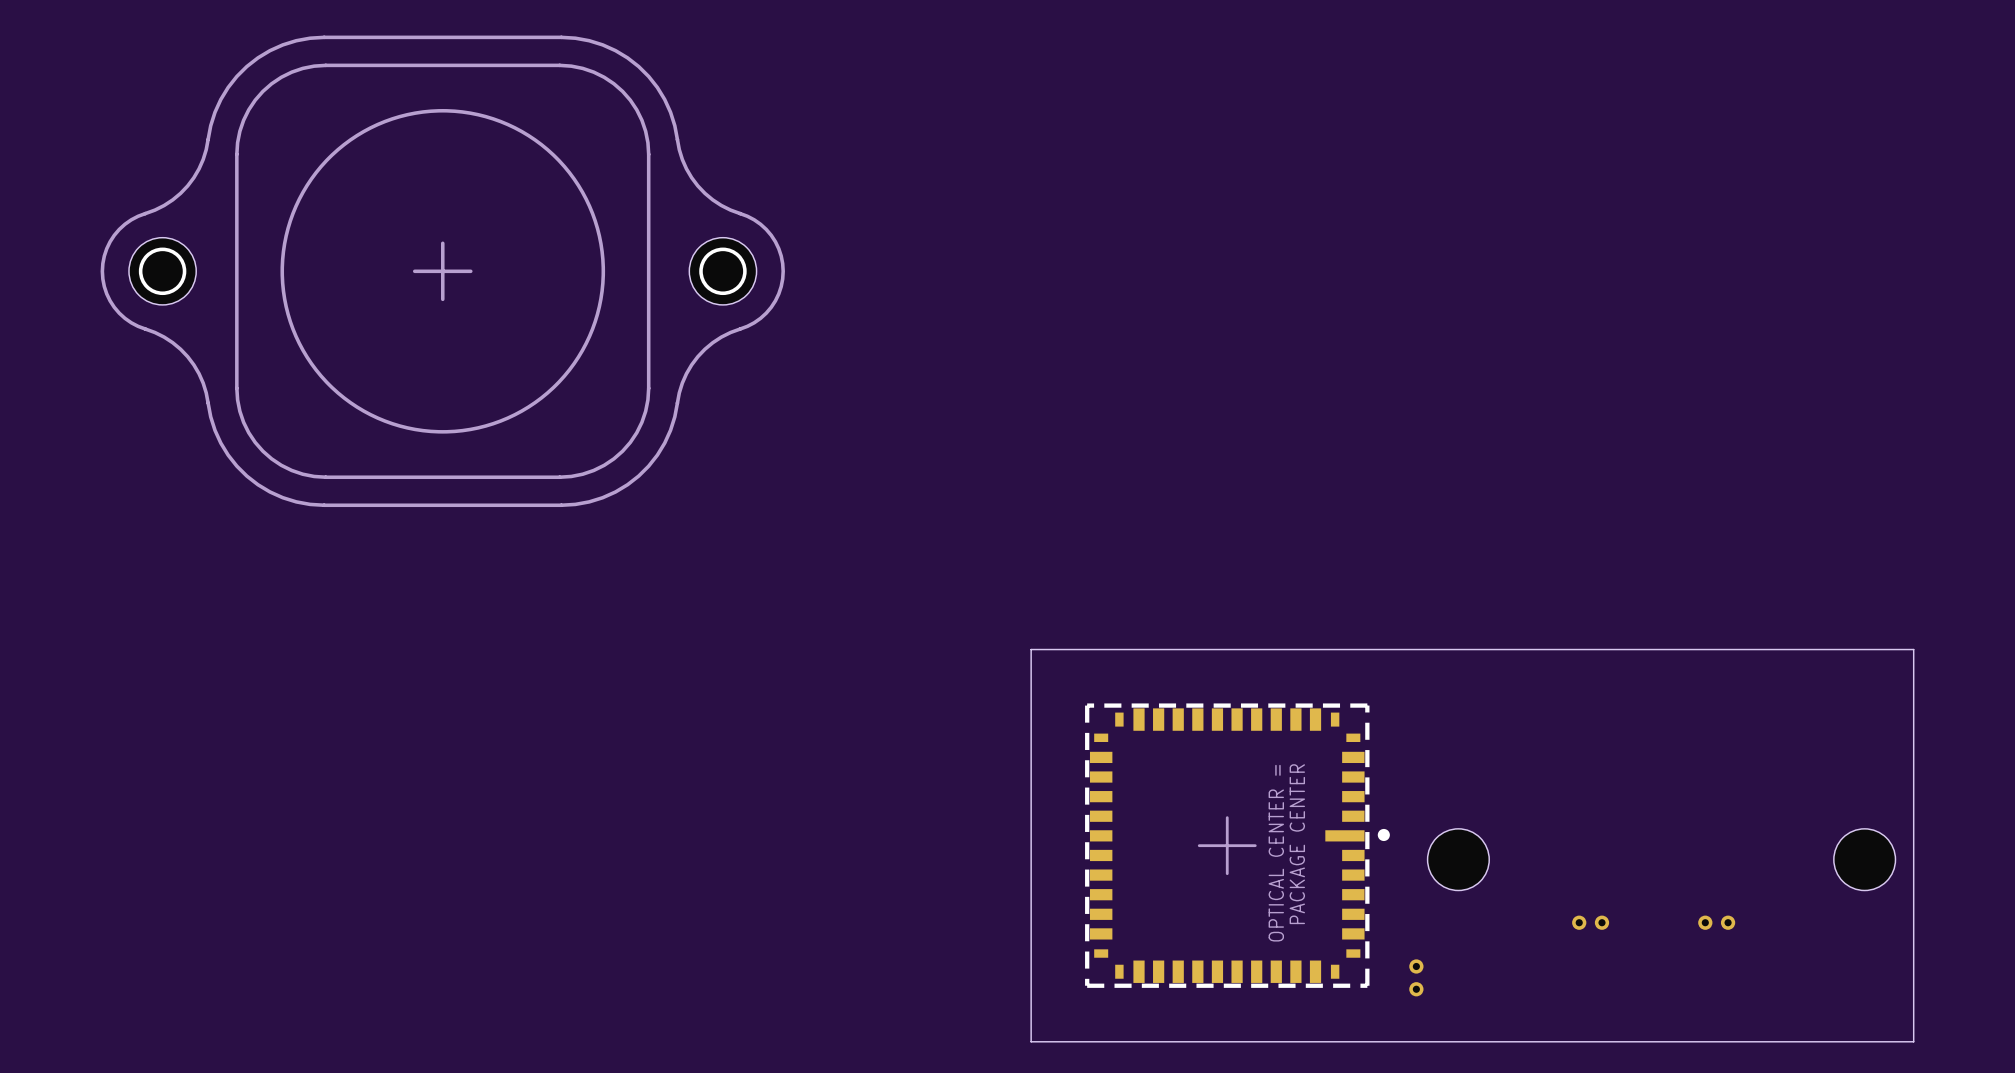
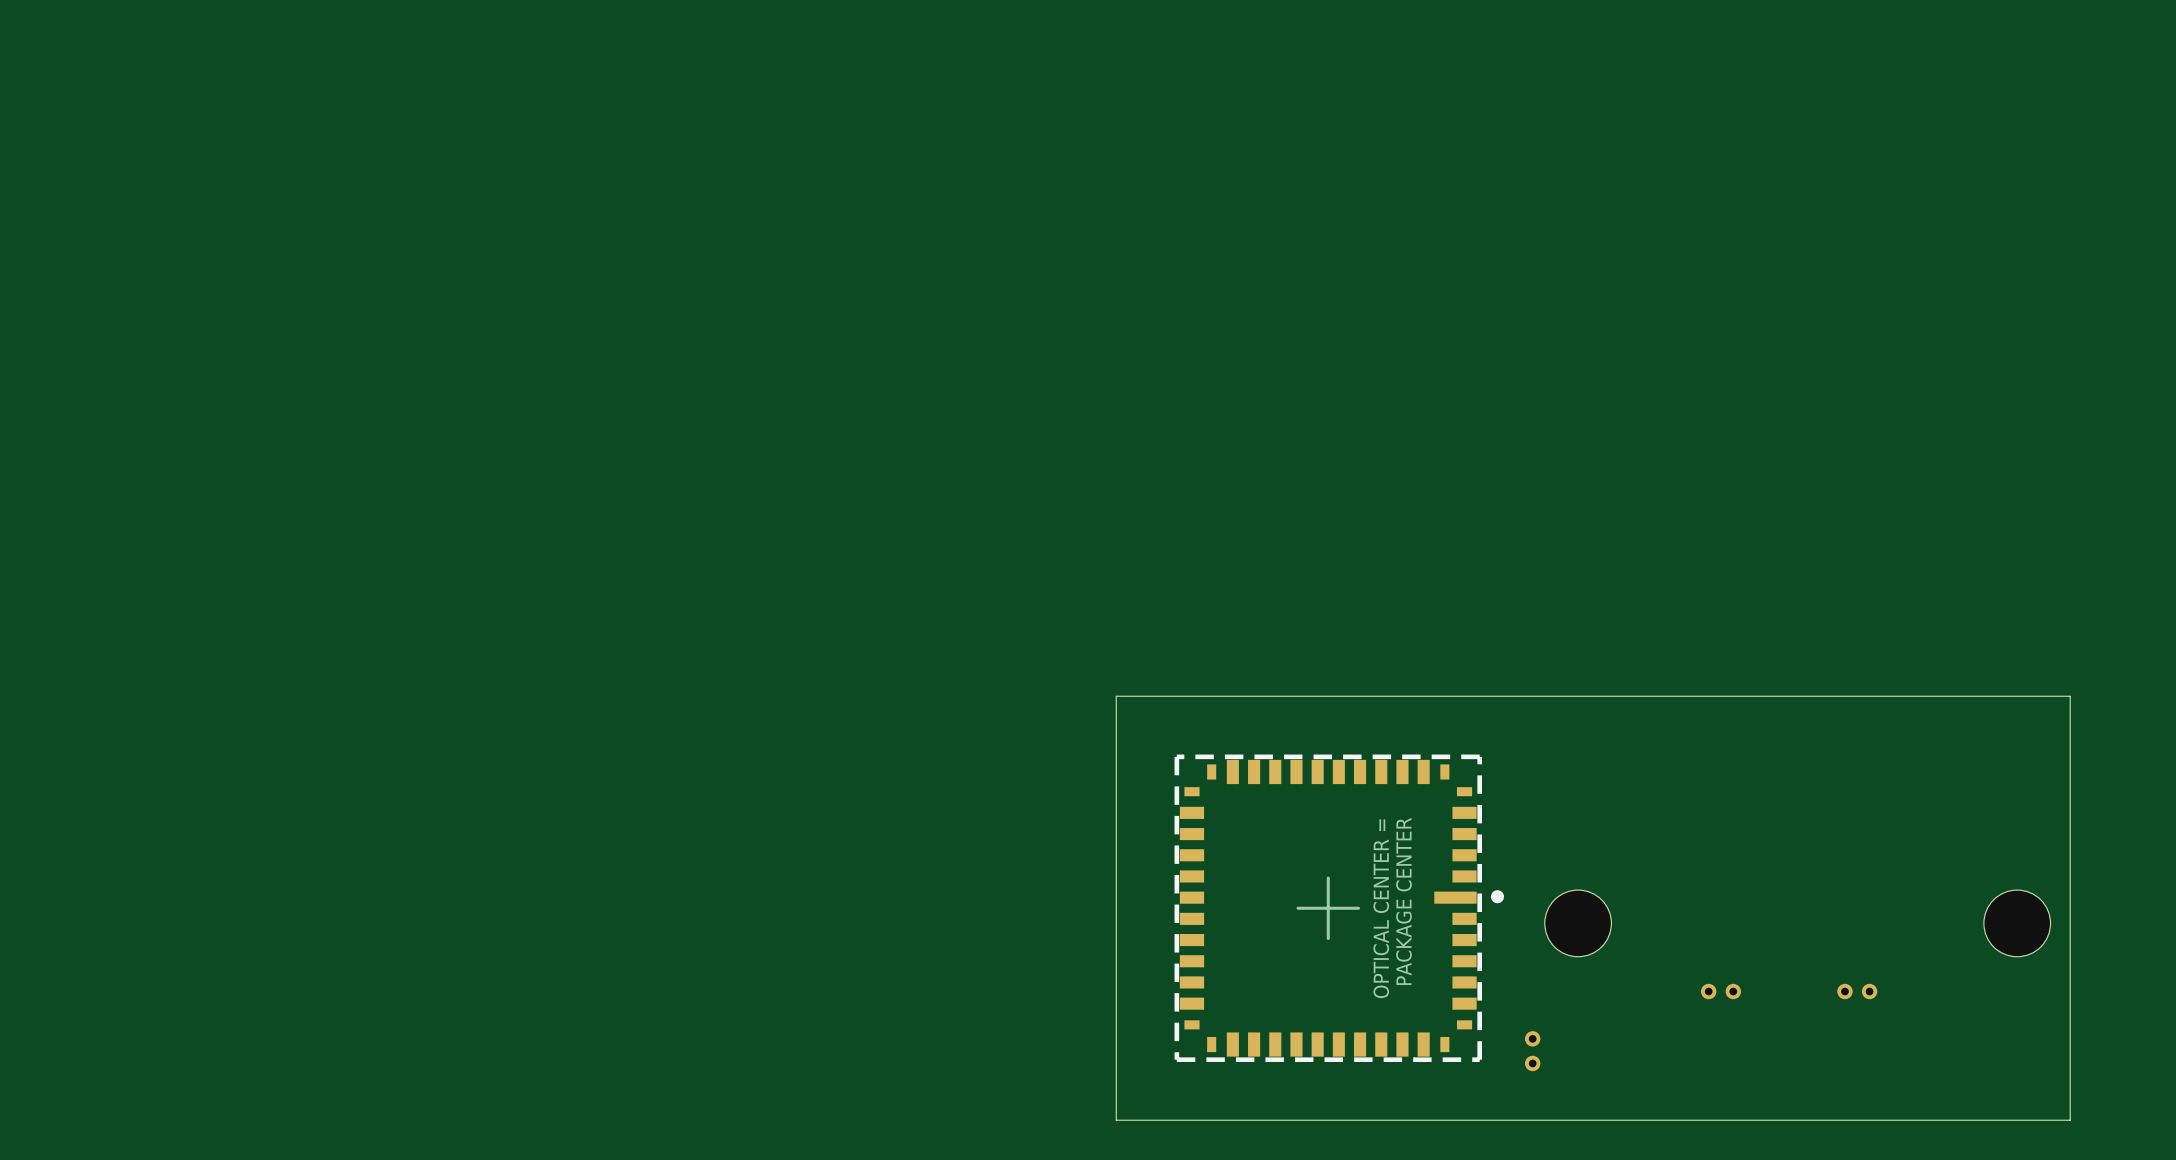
part: (442, 271) -> none

